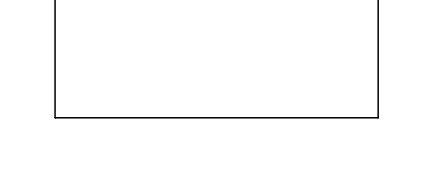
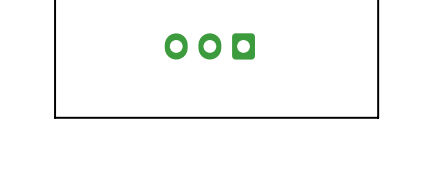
part: none -> (209, 46)

